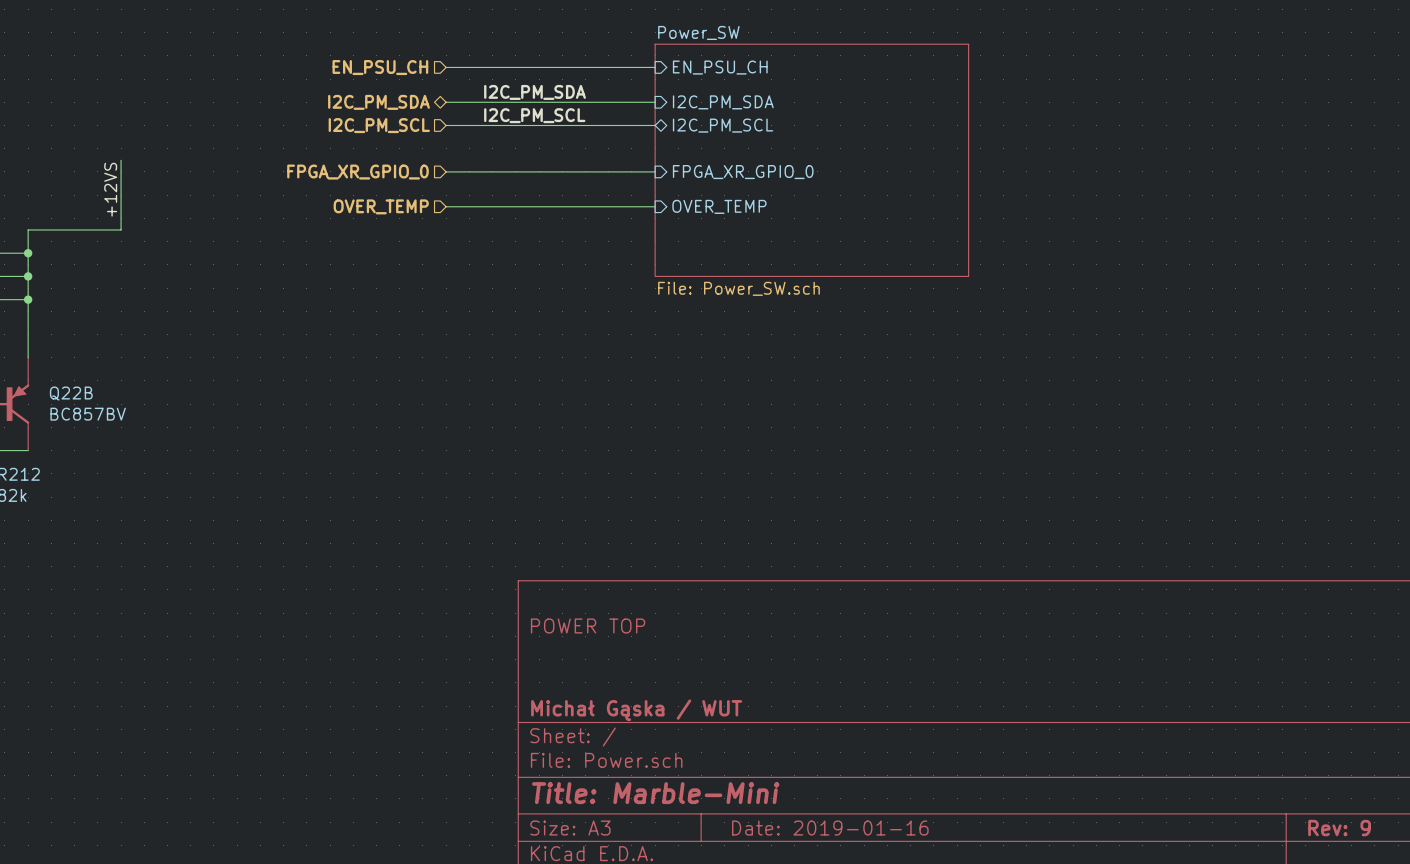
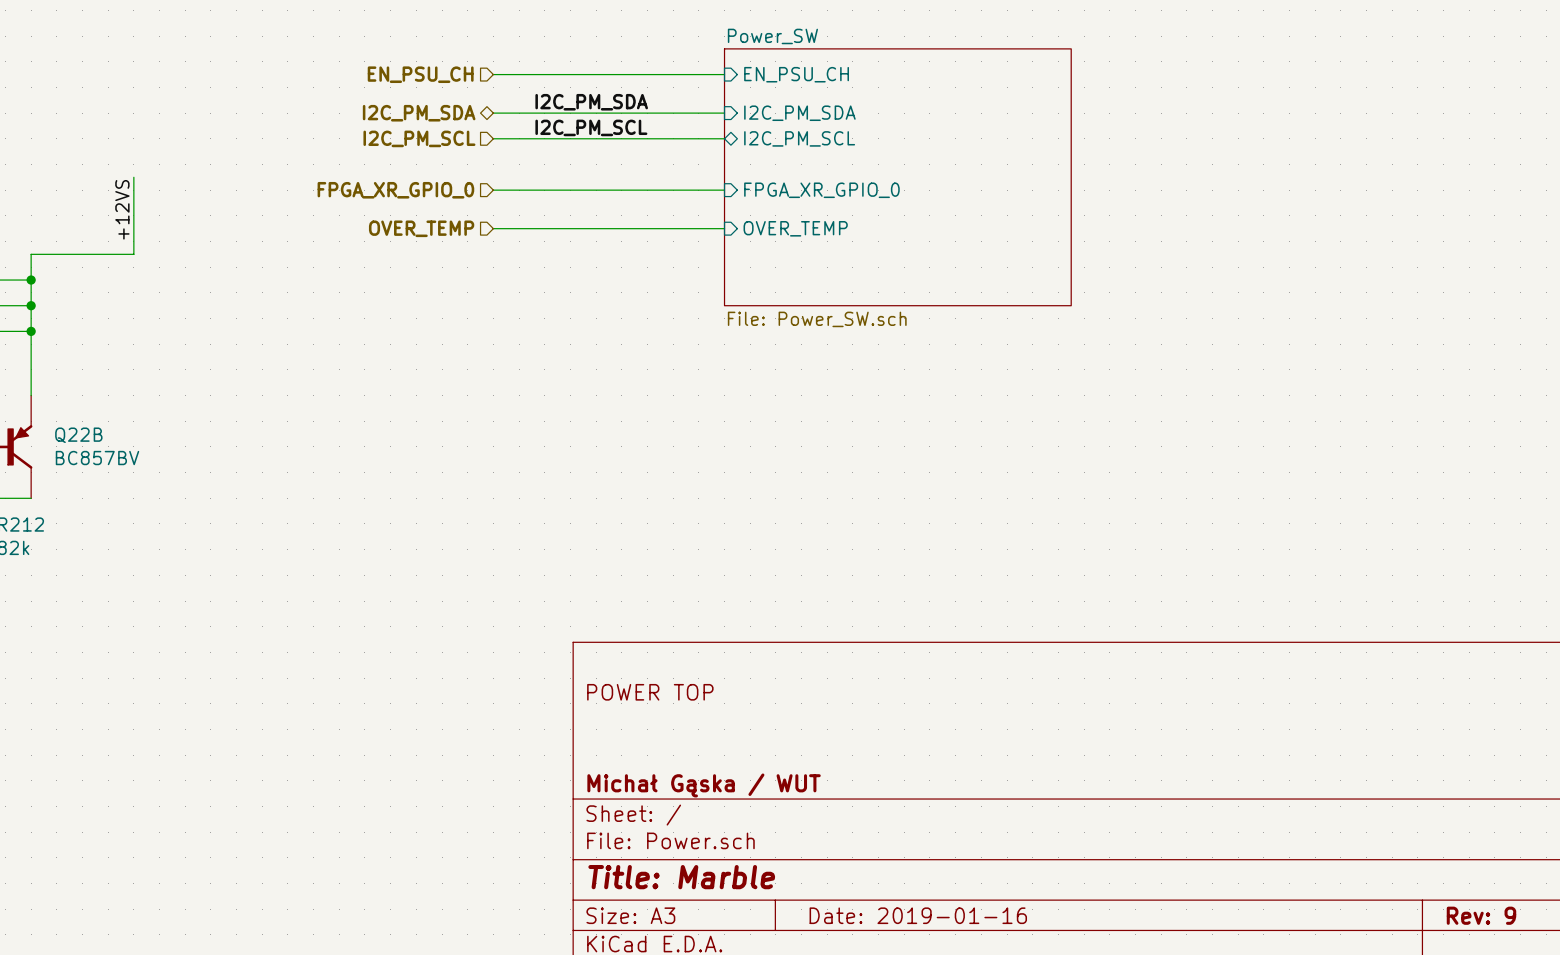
title block: Title: Marble-Mini (655, 793) -> Title: Marble (681, 877)

